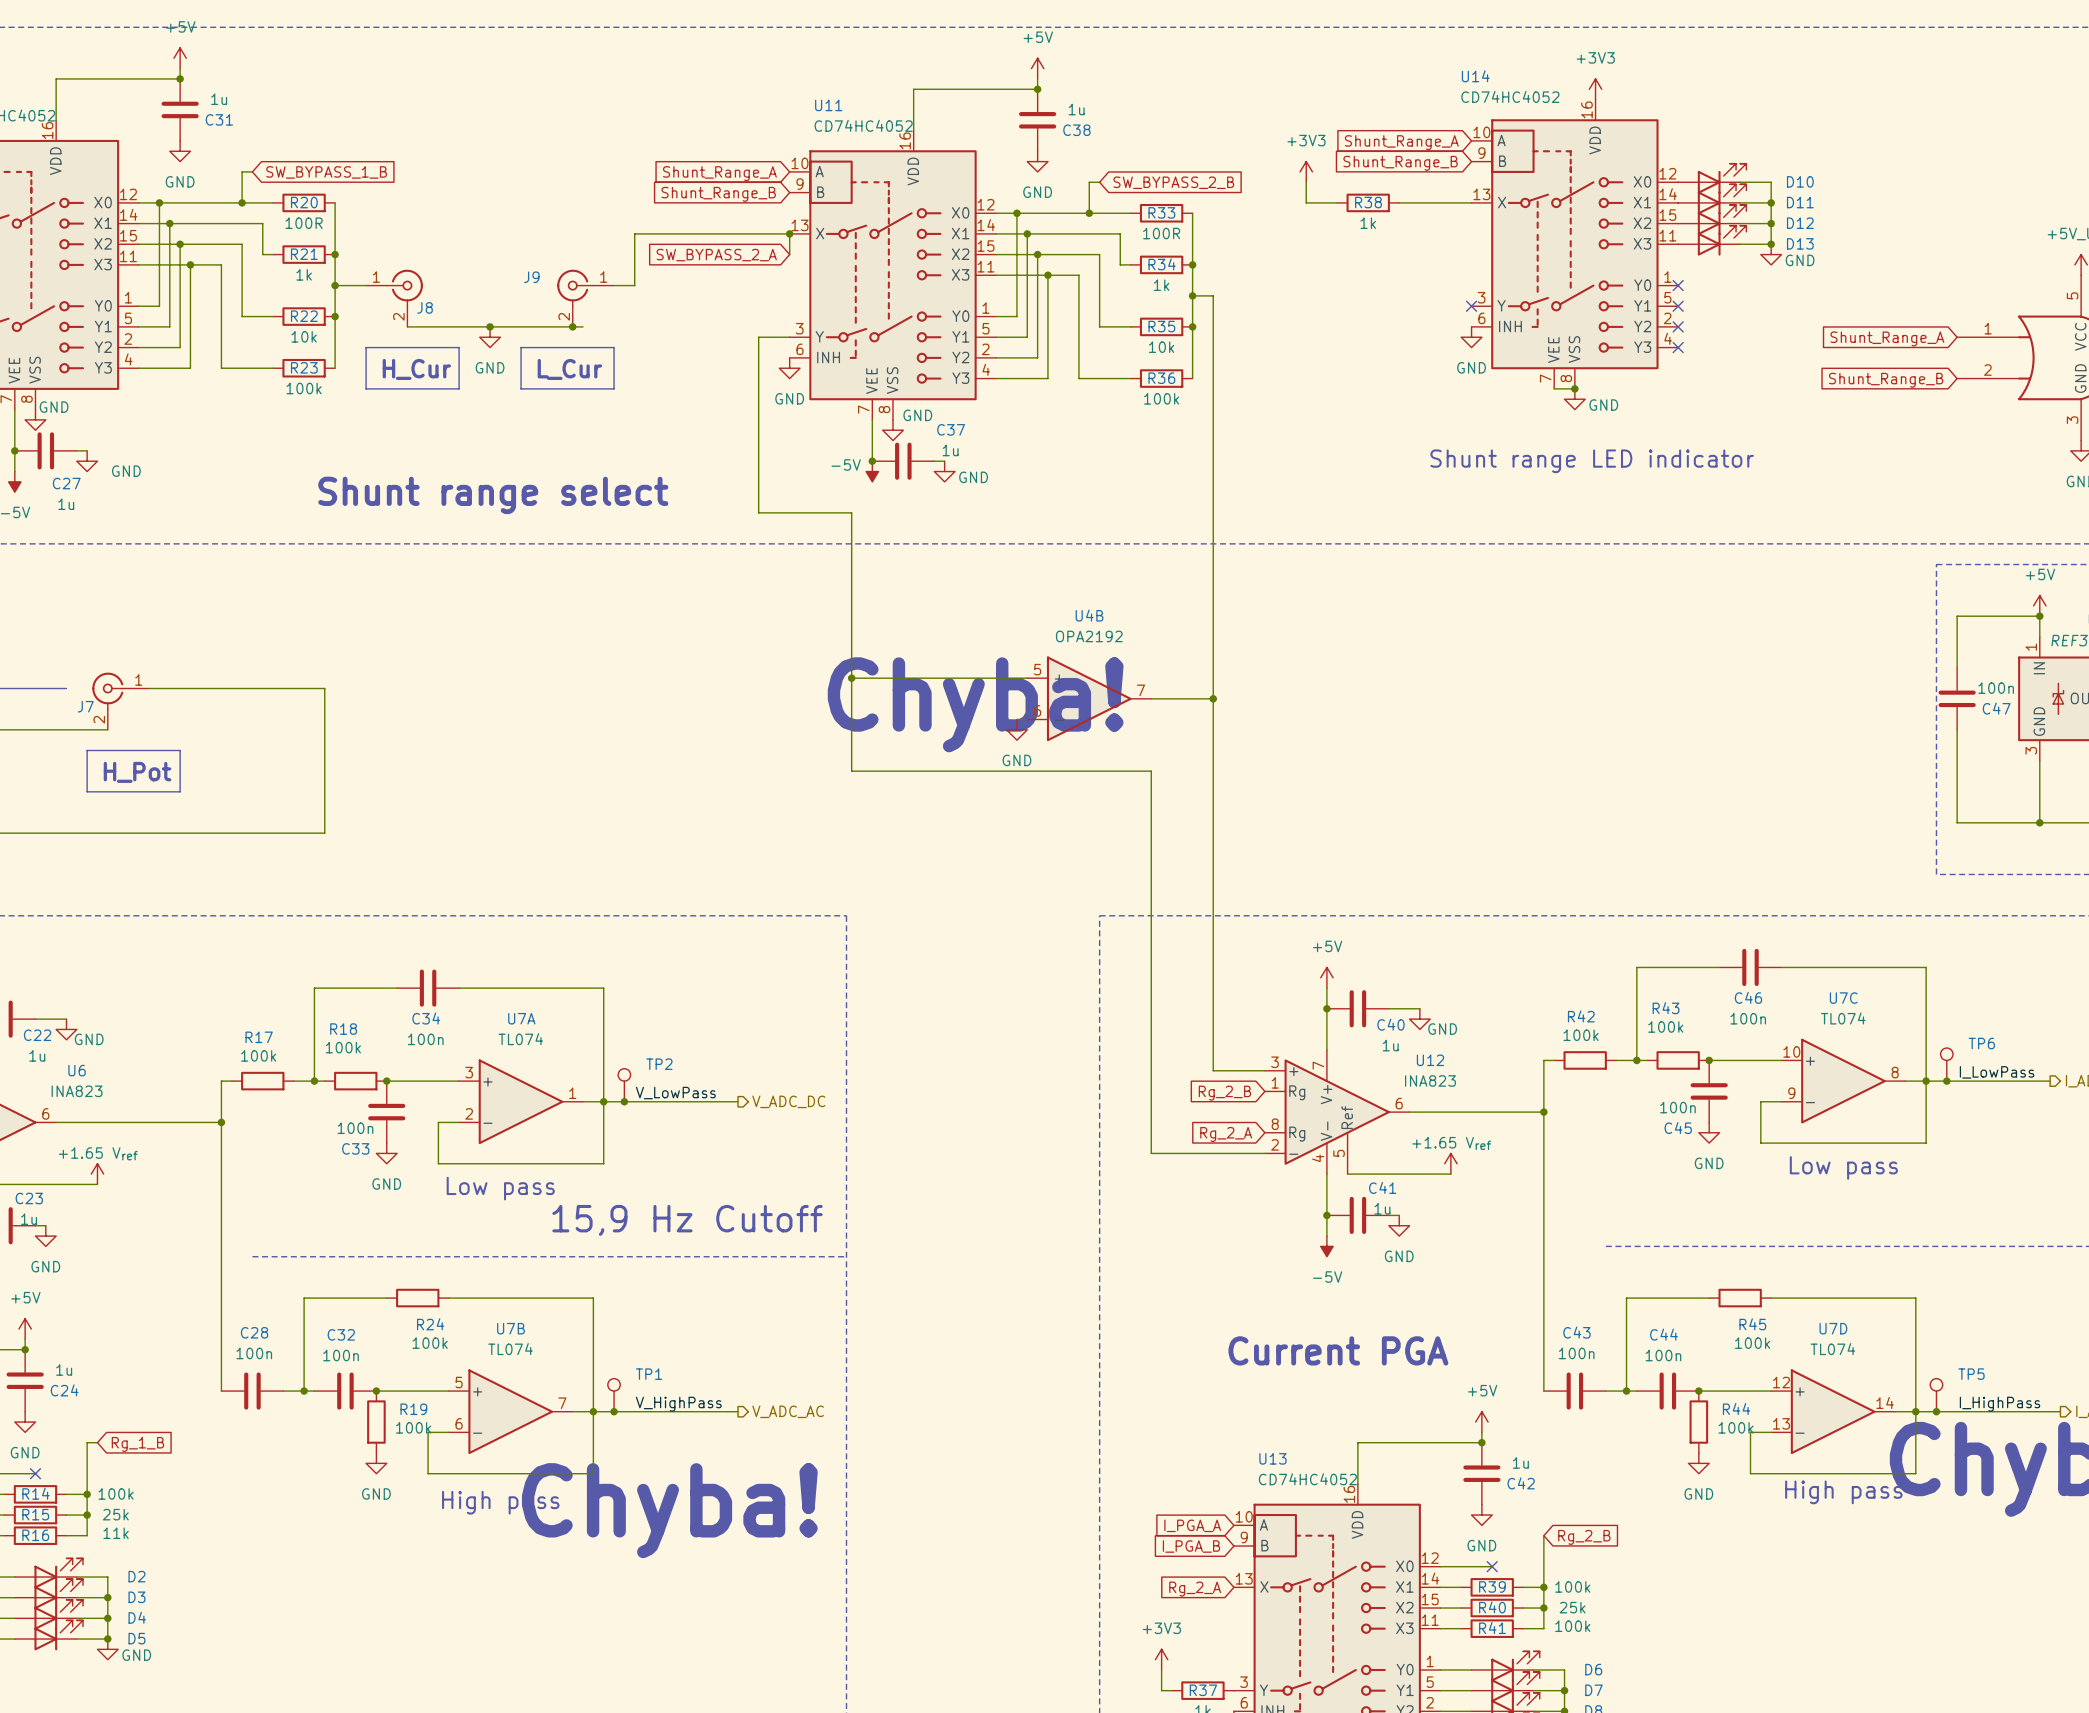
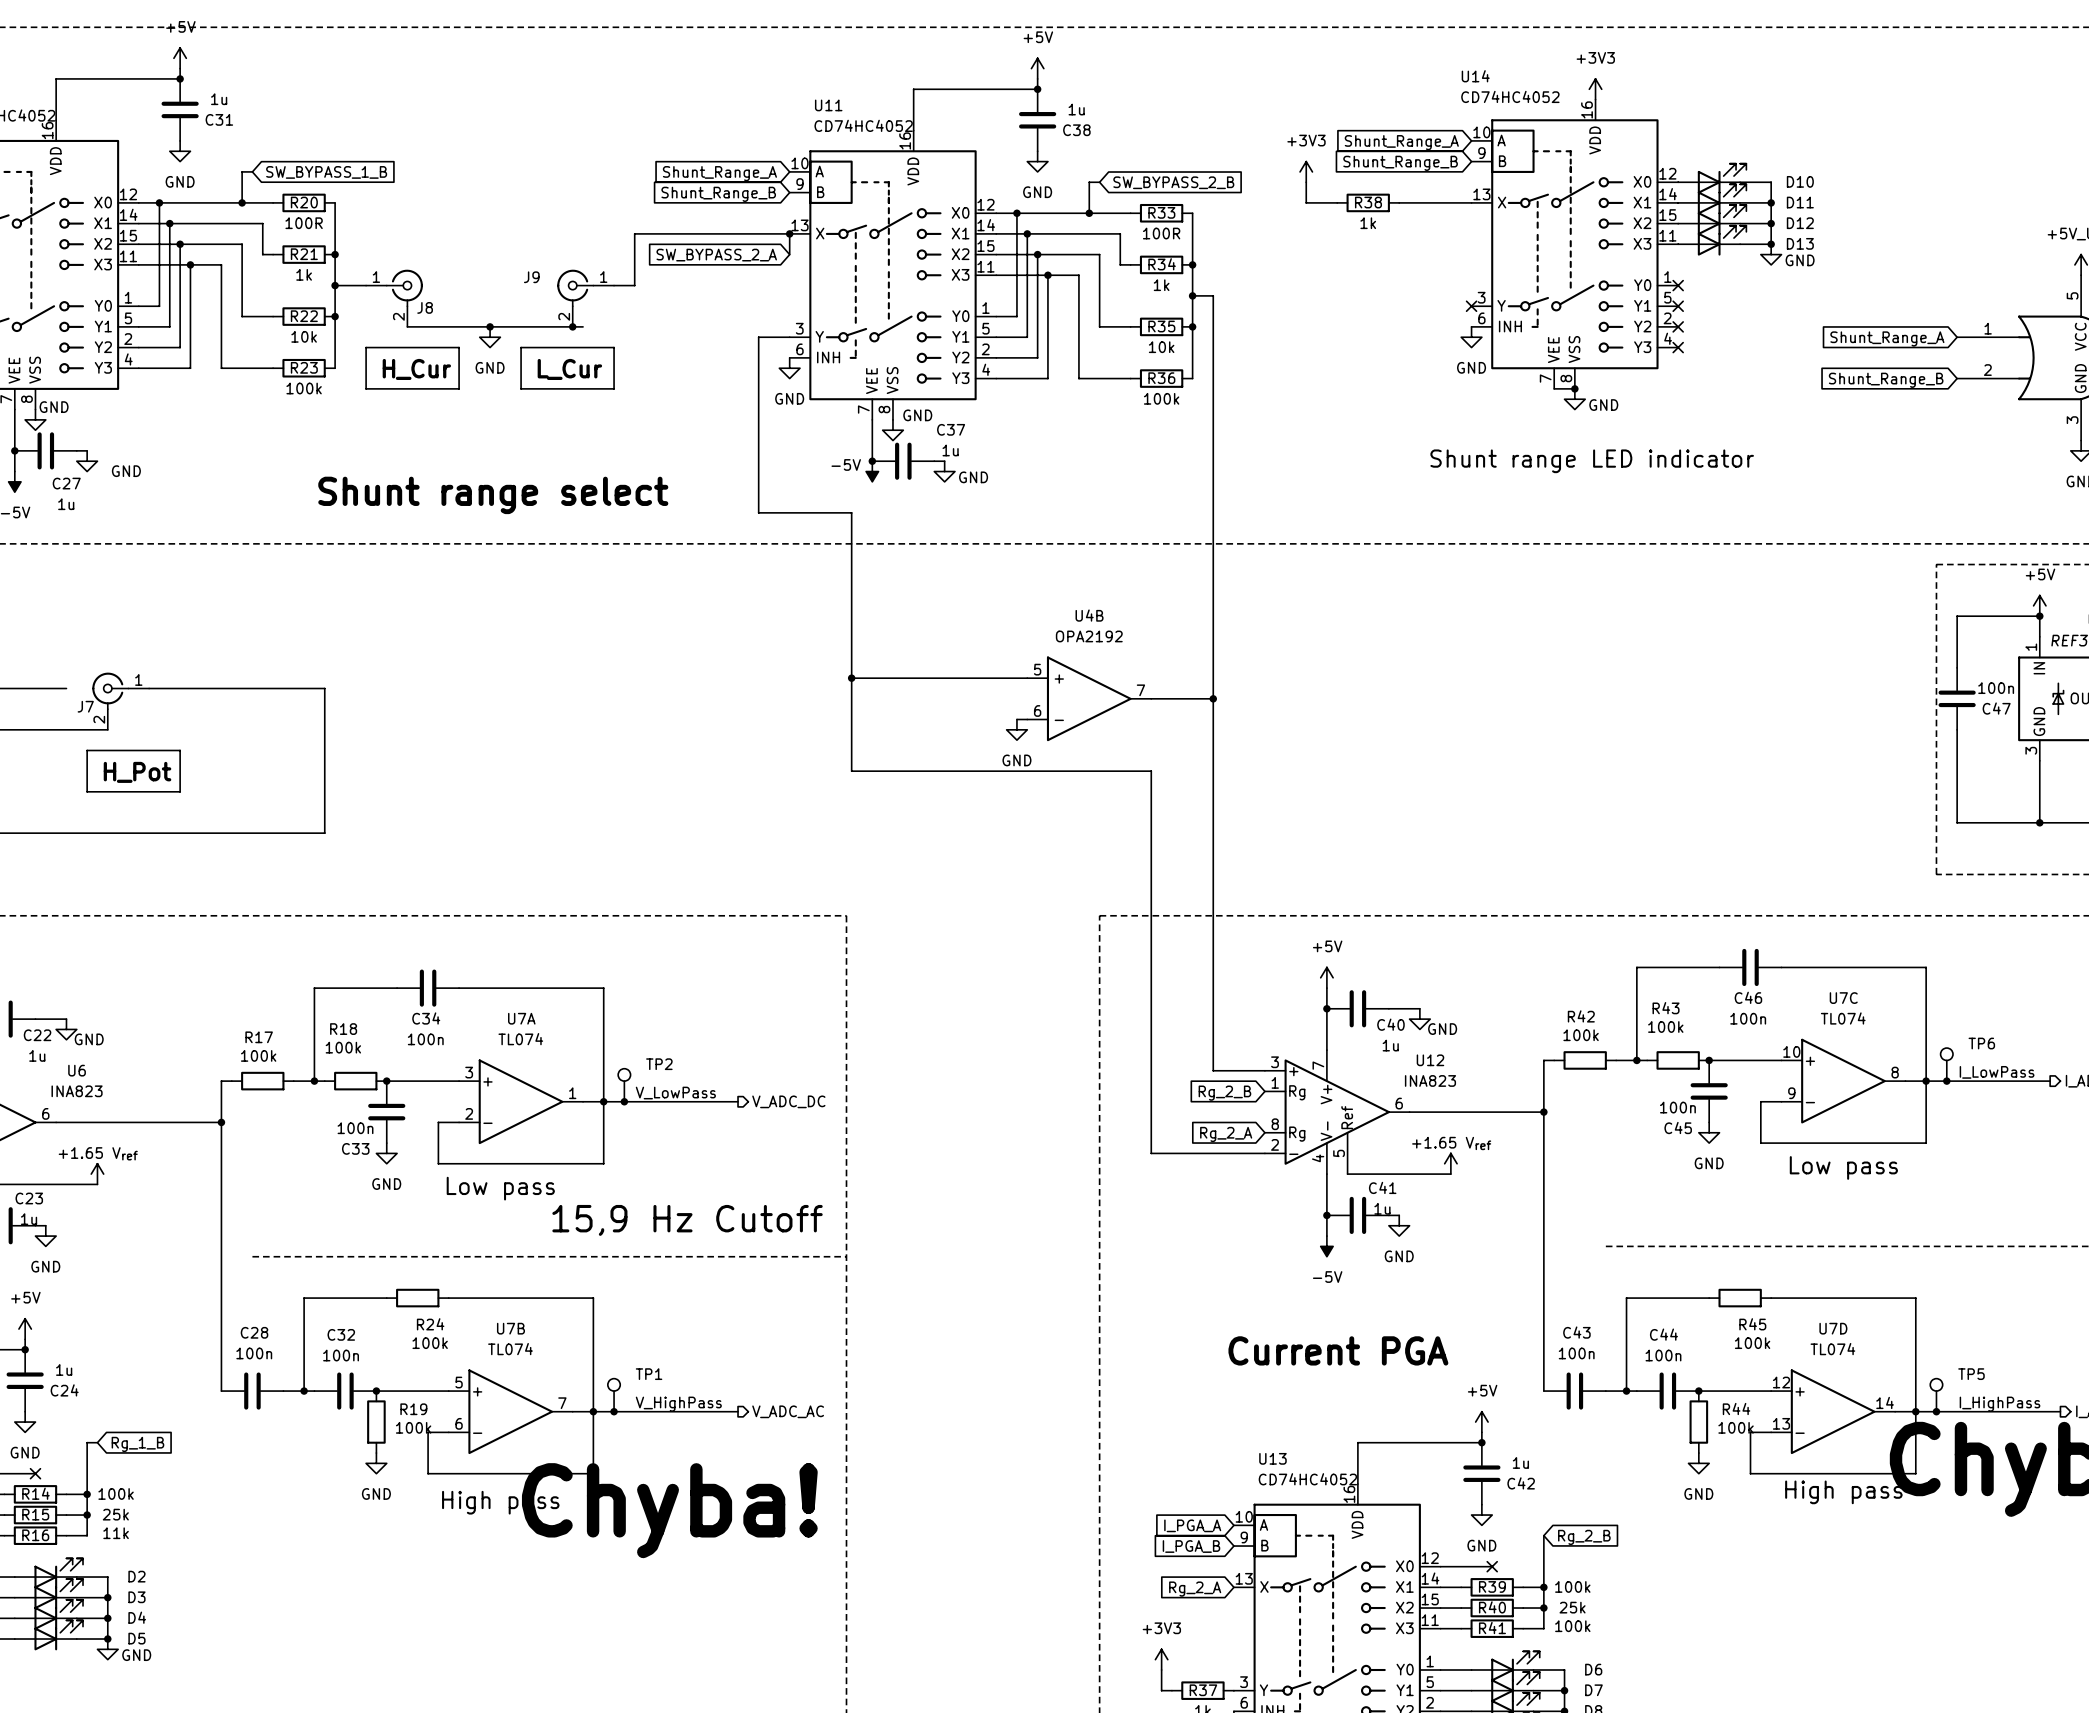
text: Chyba! (975, 704) -> none

